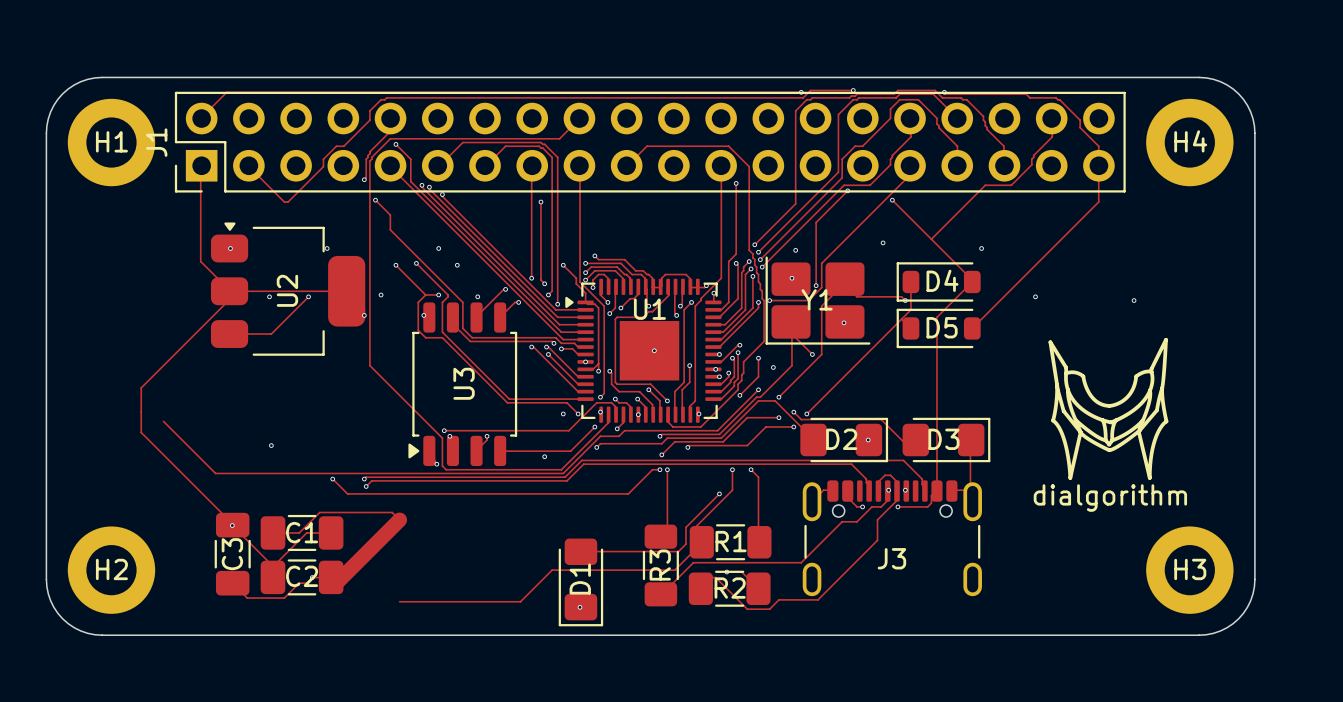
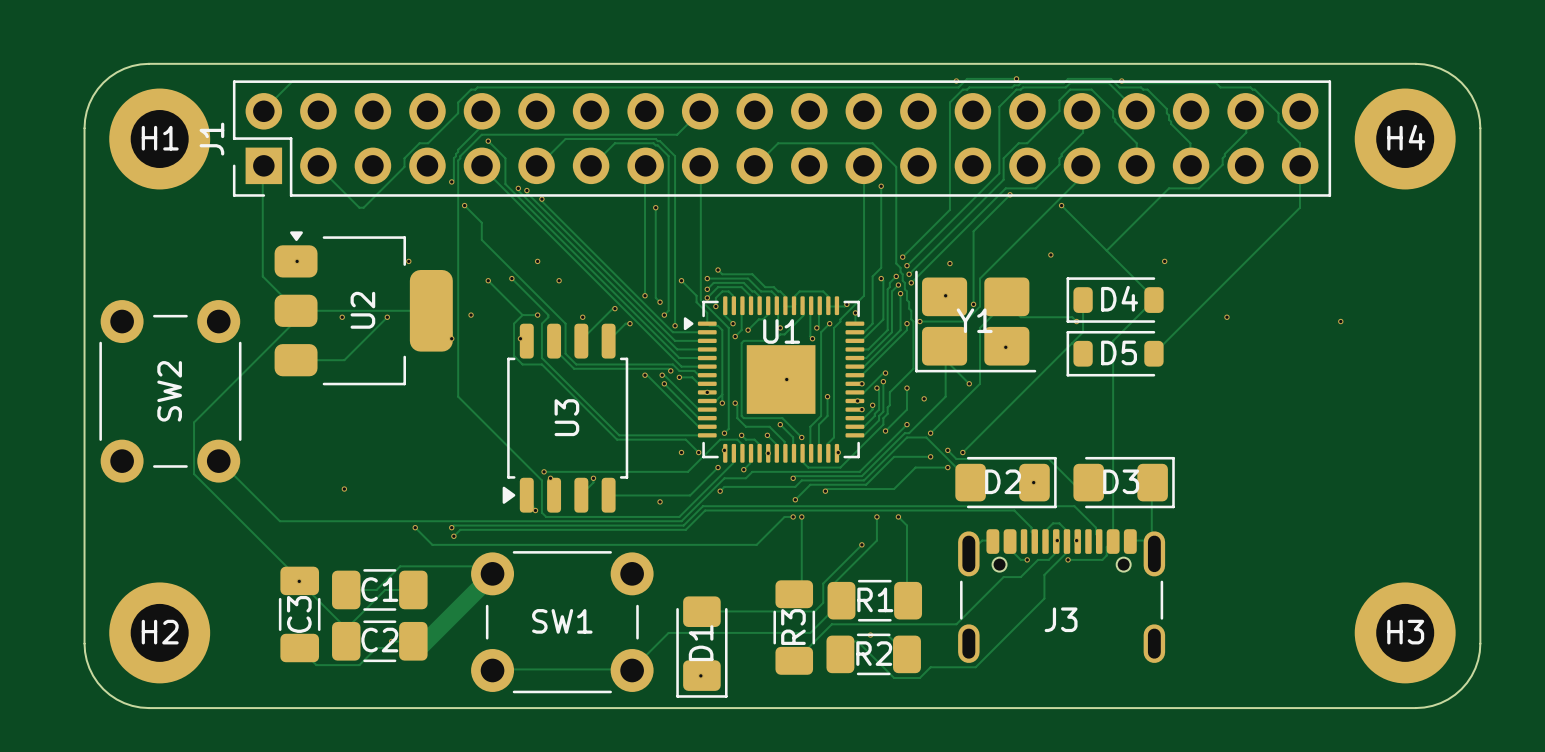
drawing: [1048, 337, 1169, 480] -> none
SW2: none -> (170, 391)
SW1: none -> (562, 622)

